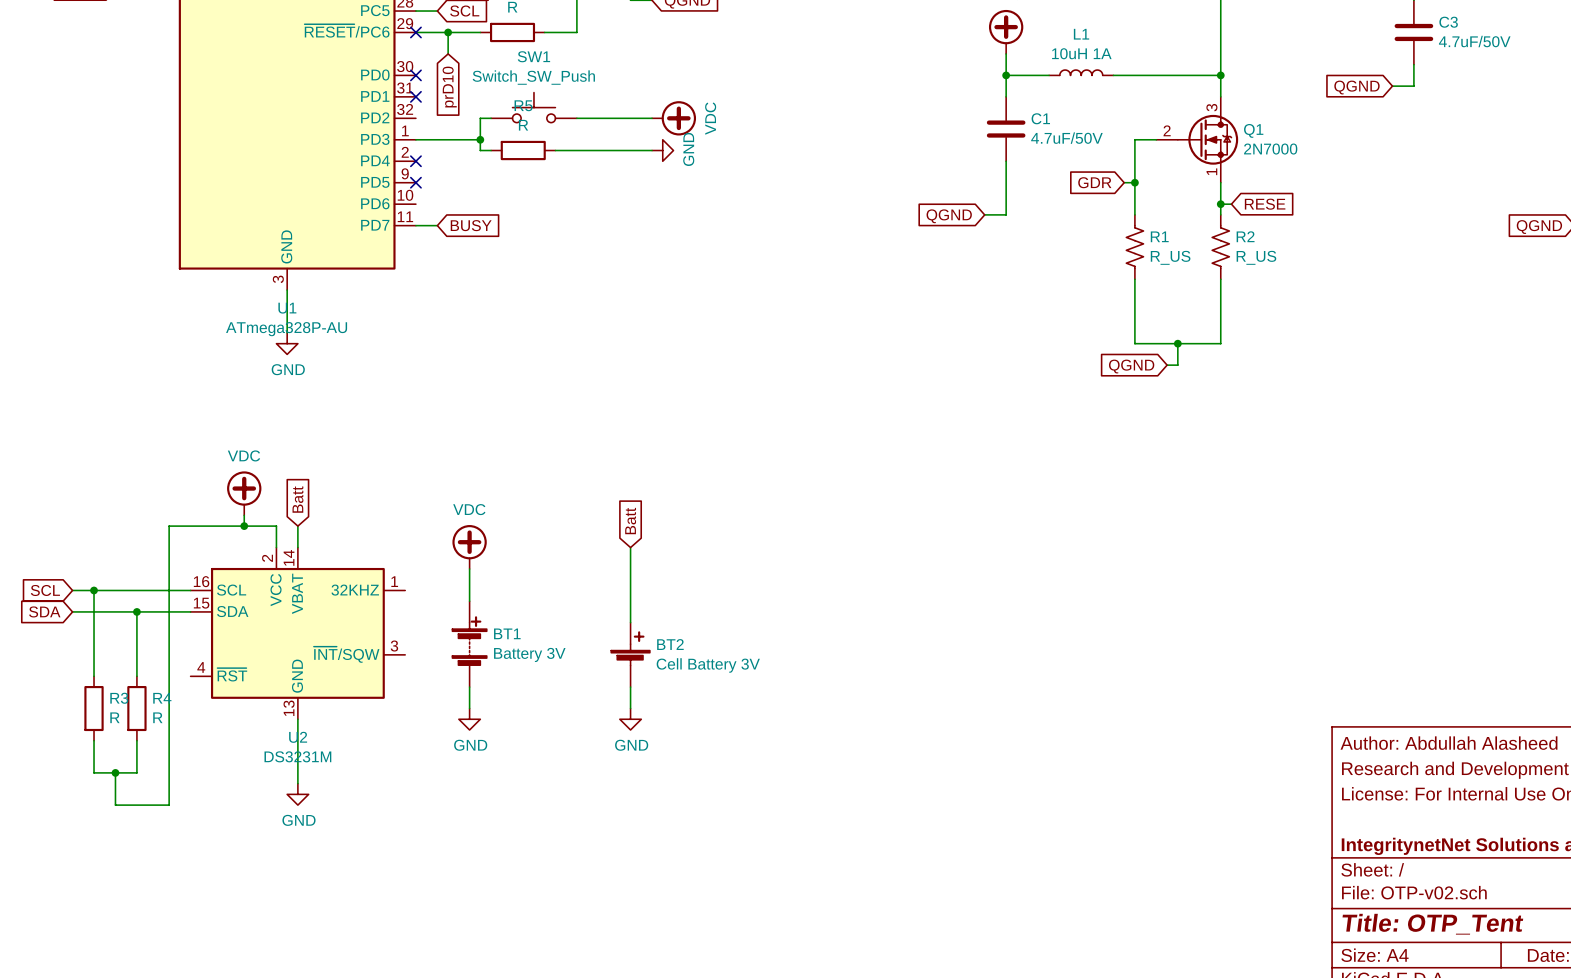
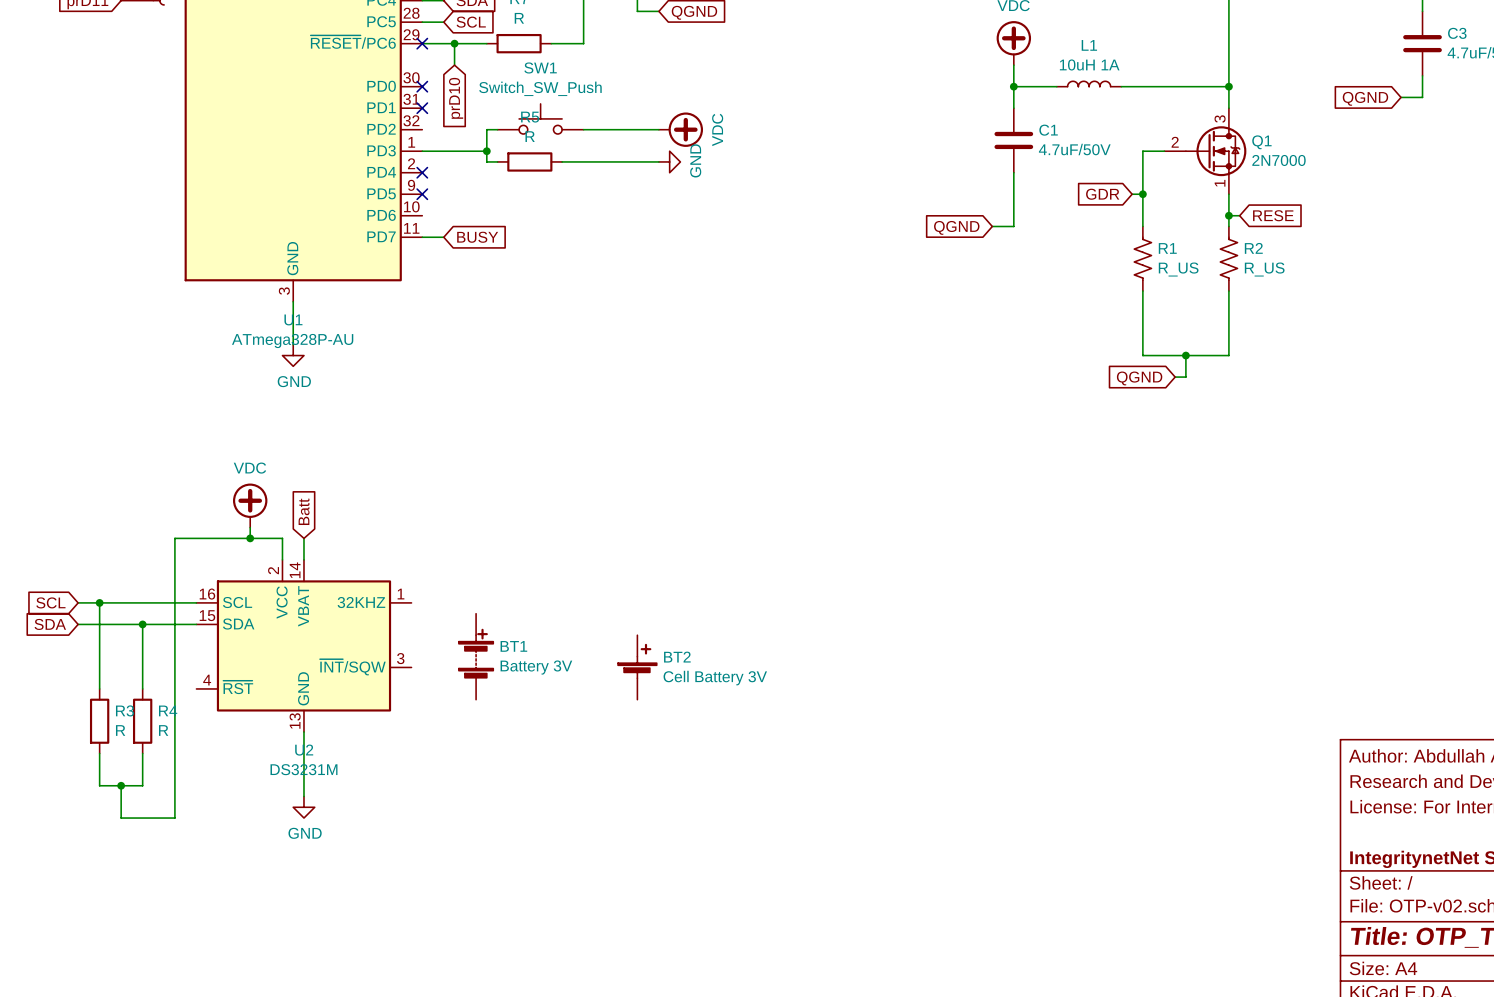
global label: Batt (630, 521) -> none
power symbol: VDC (469, 547) -> none
wire: (630, 547) (630, 622) -> none
wire: (469, 569) (469, 601) -> none
wire: (469, 687) (469, 708) -> none
wire: (630, 687) (630, 708) -> none
power symbol: GND (469, 719) -> none
power symbol: GND (630, 719) -> none

